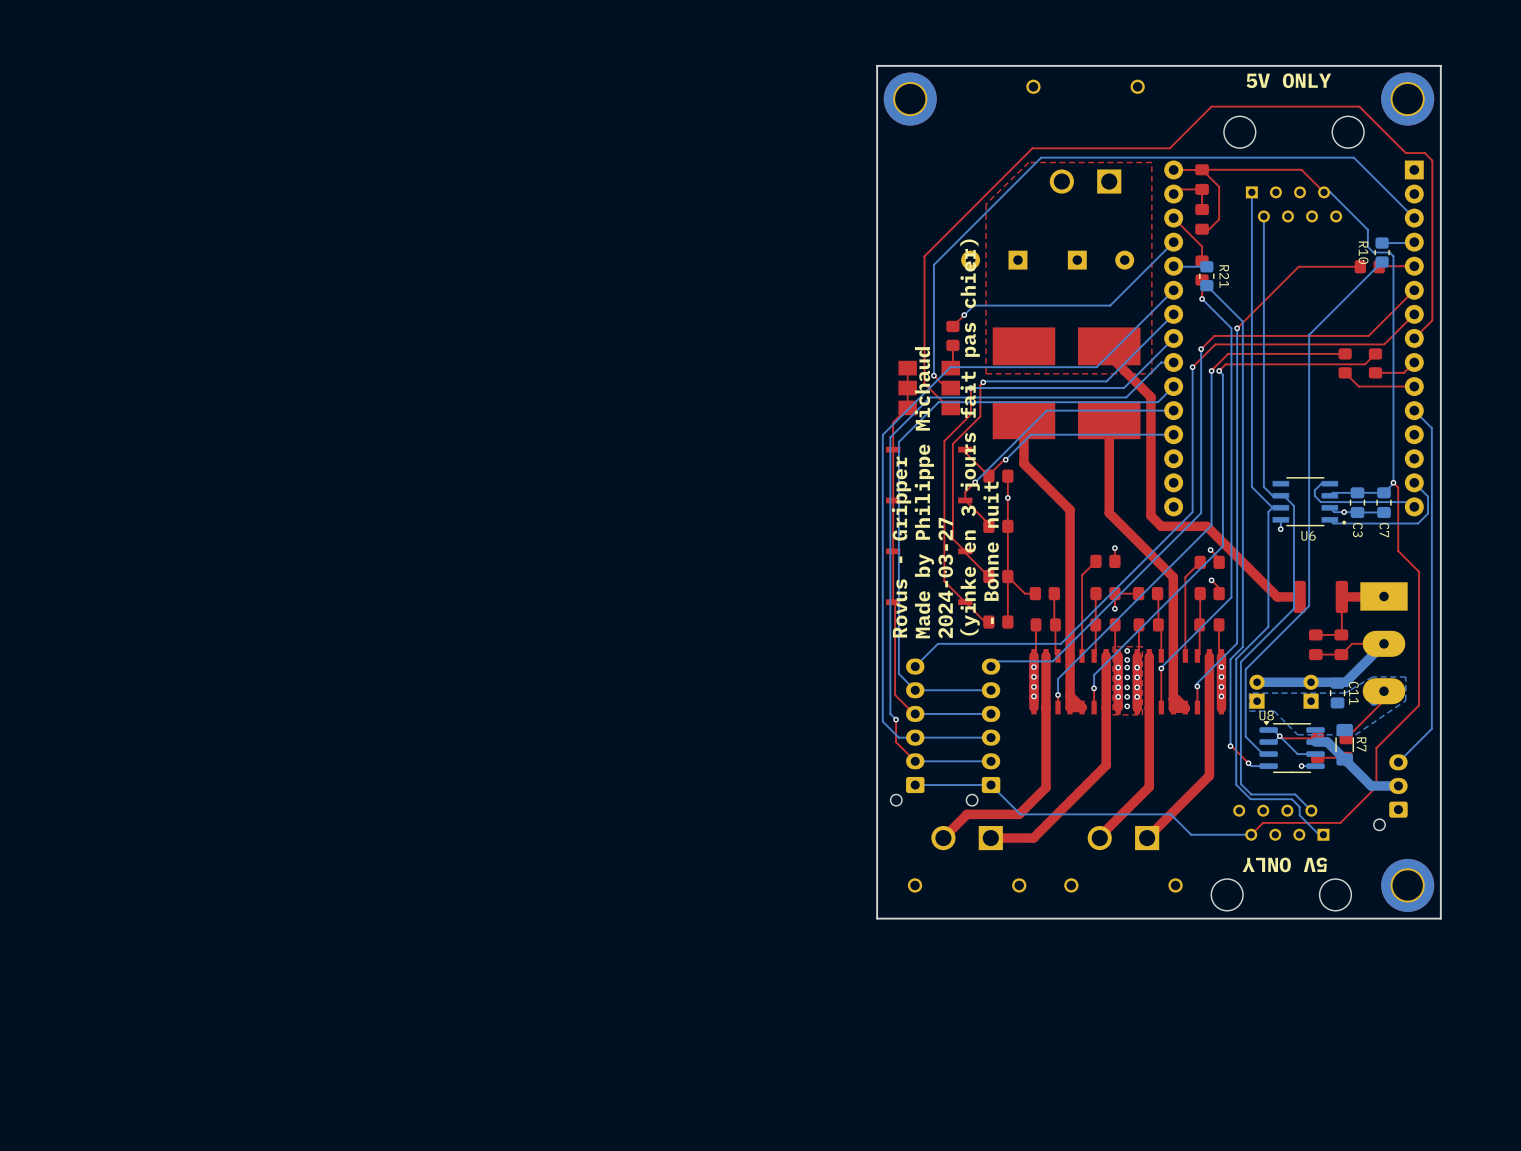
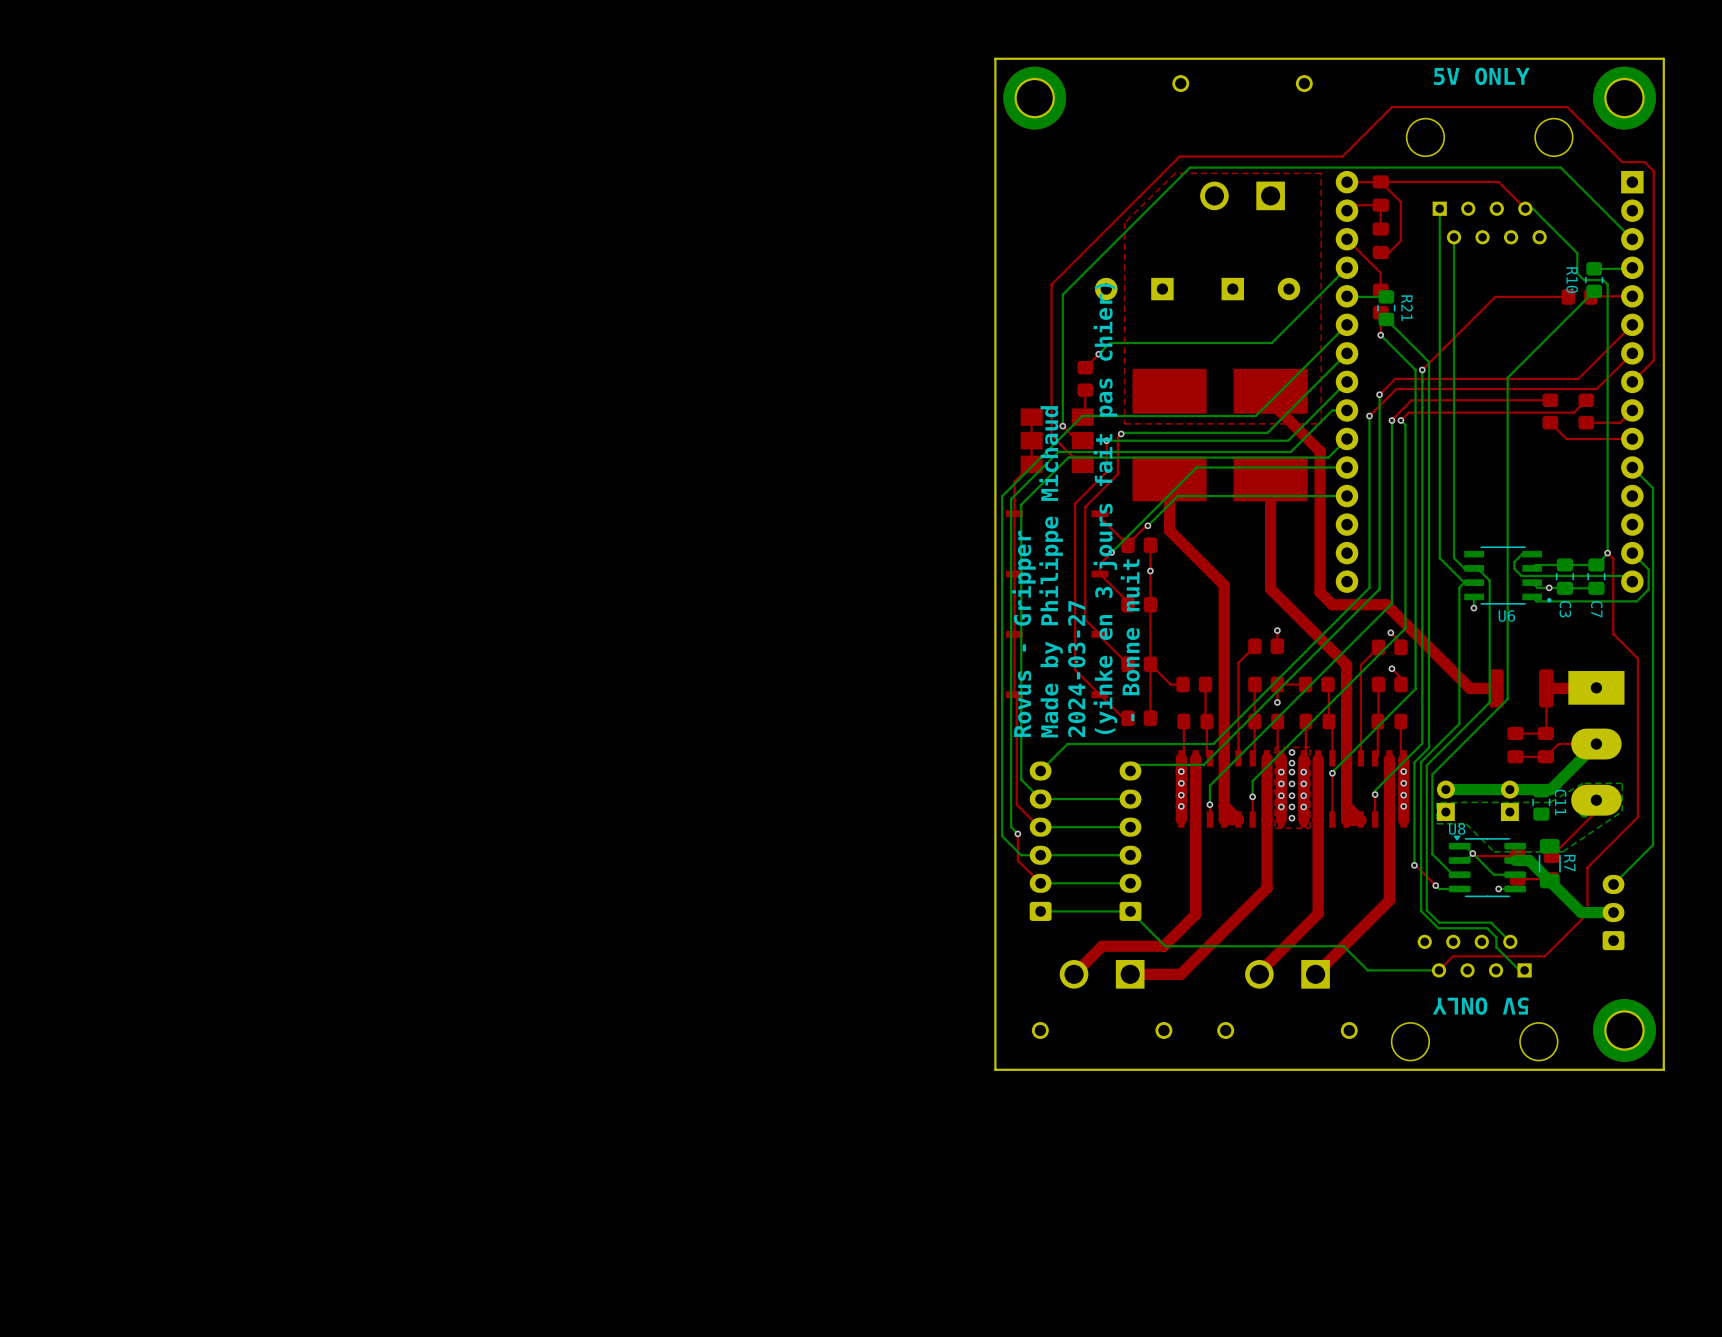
part: (907, 732) -> none
part: (983, 732) -> none
part: (1390, 792) -> none

